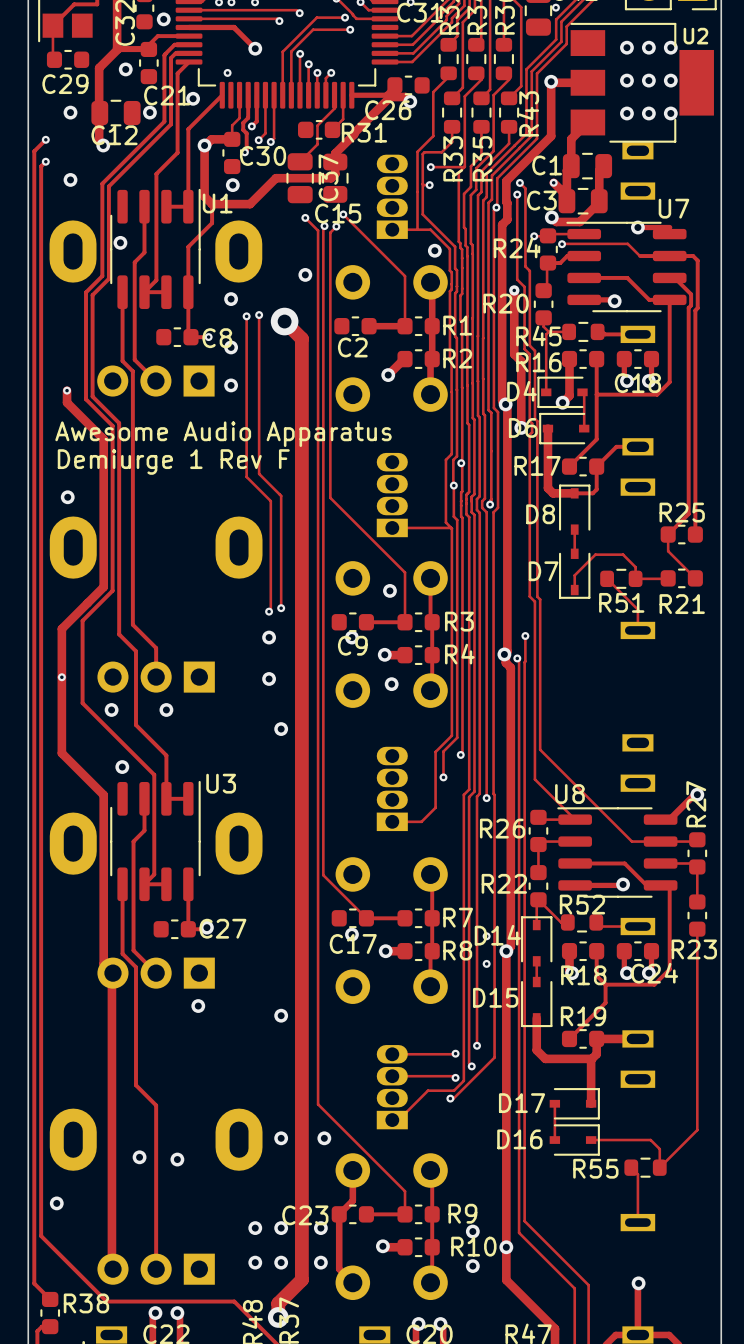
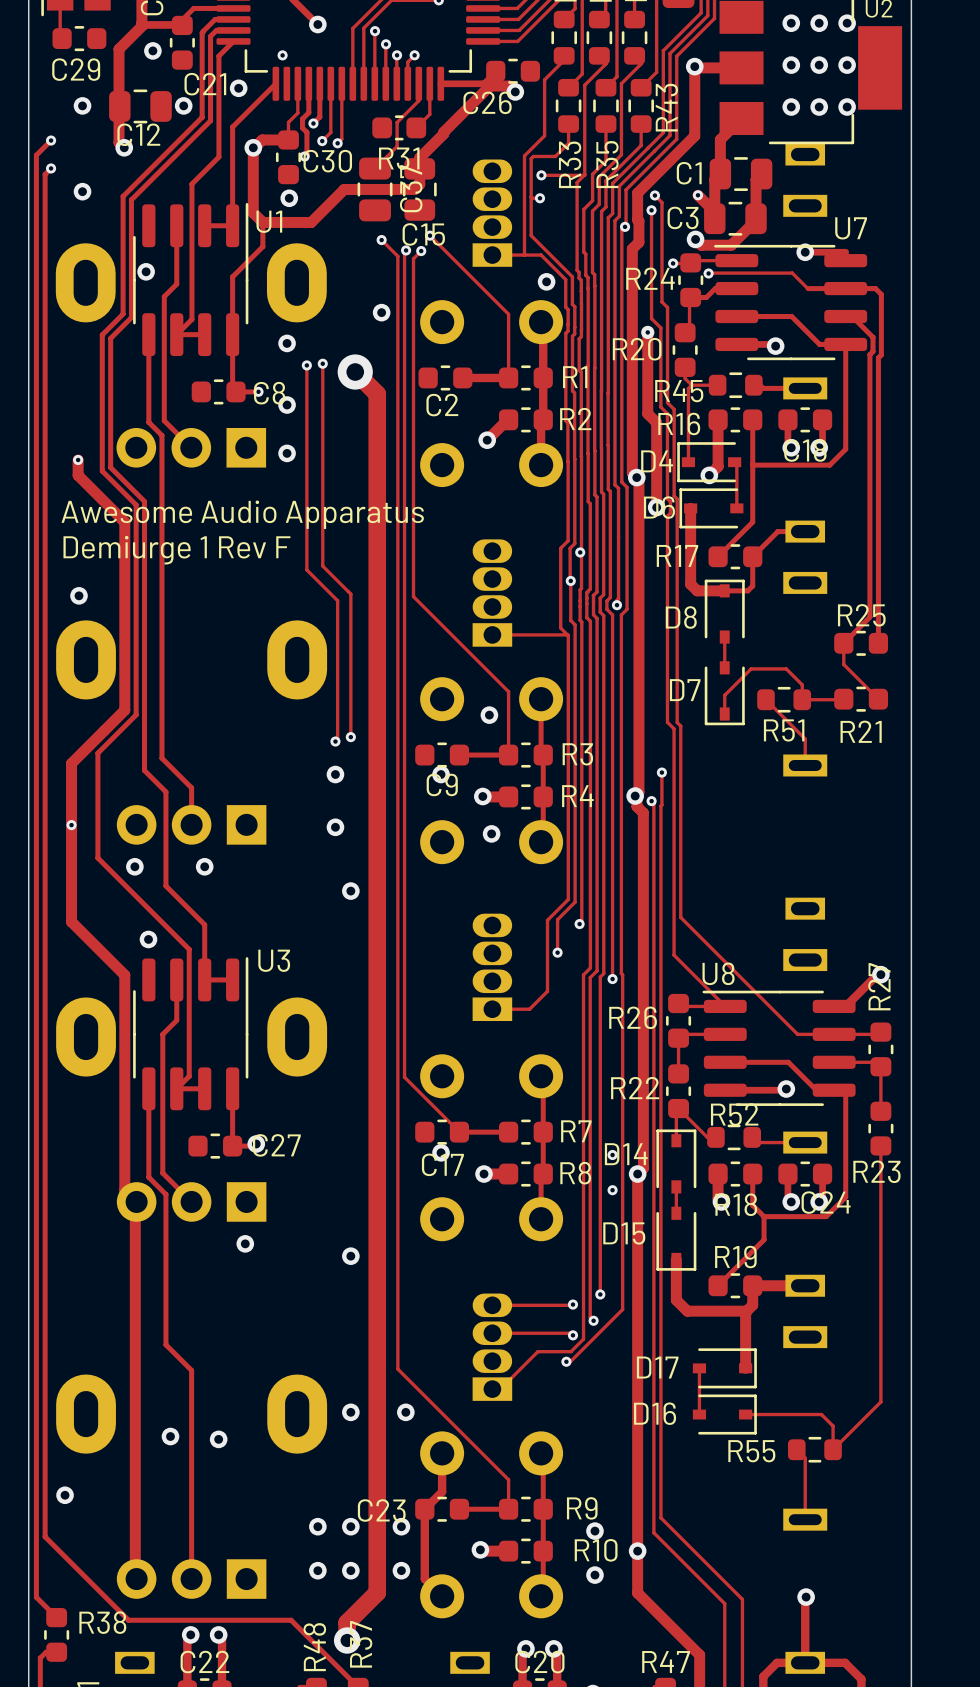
R31 name position: R31 (364, 132) -> R31 (399, 158)

